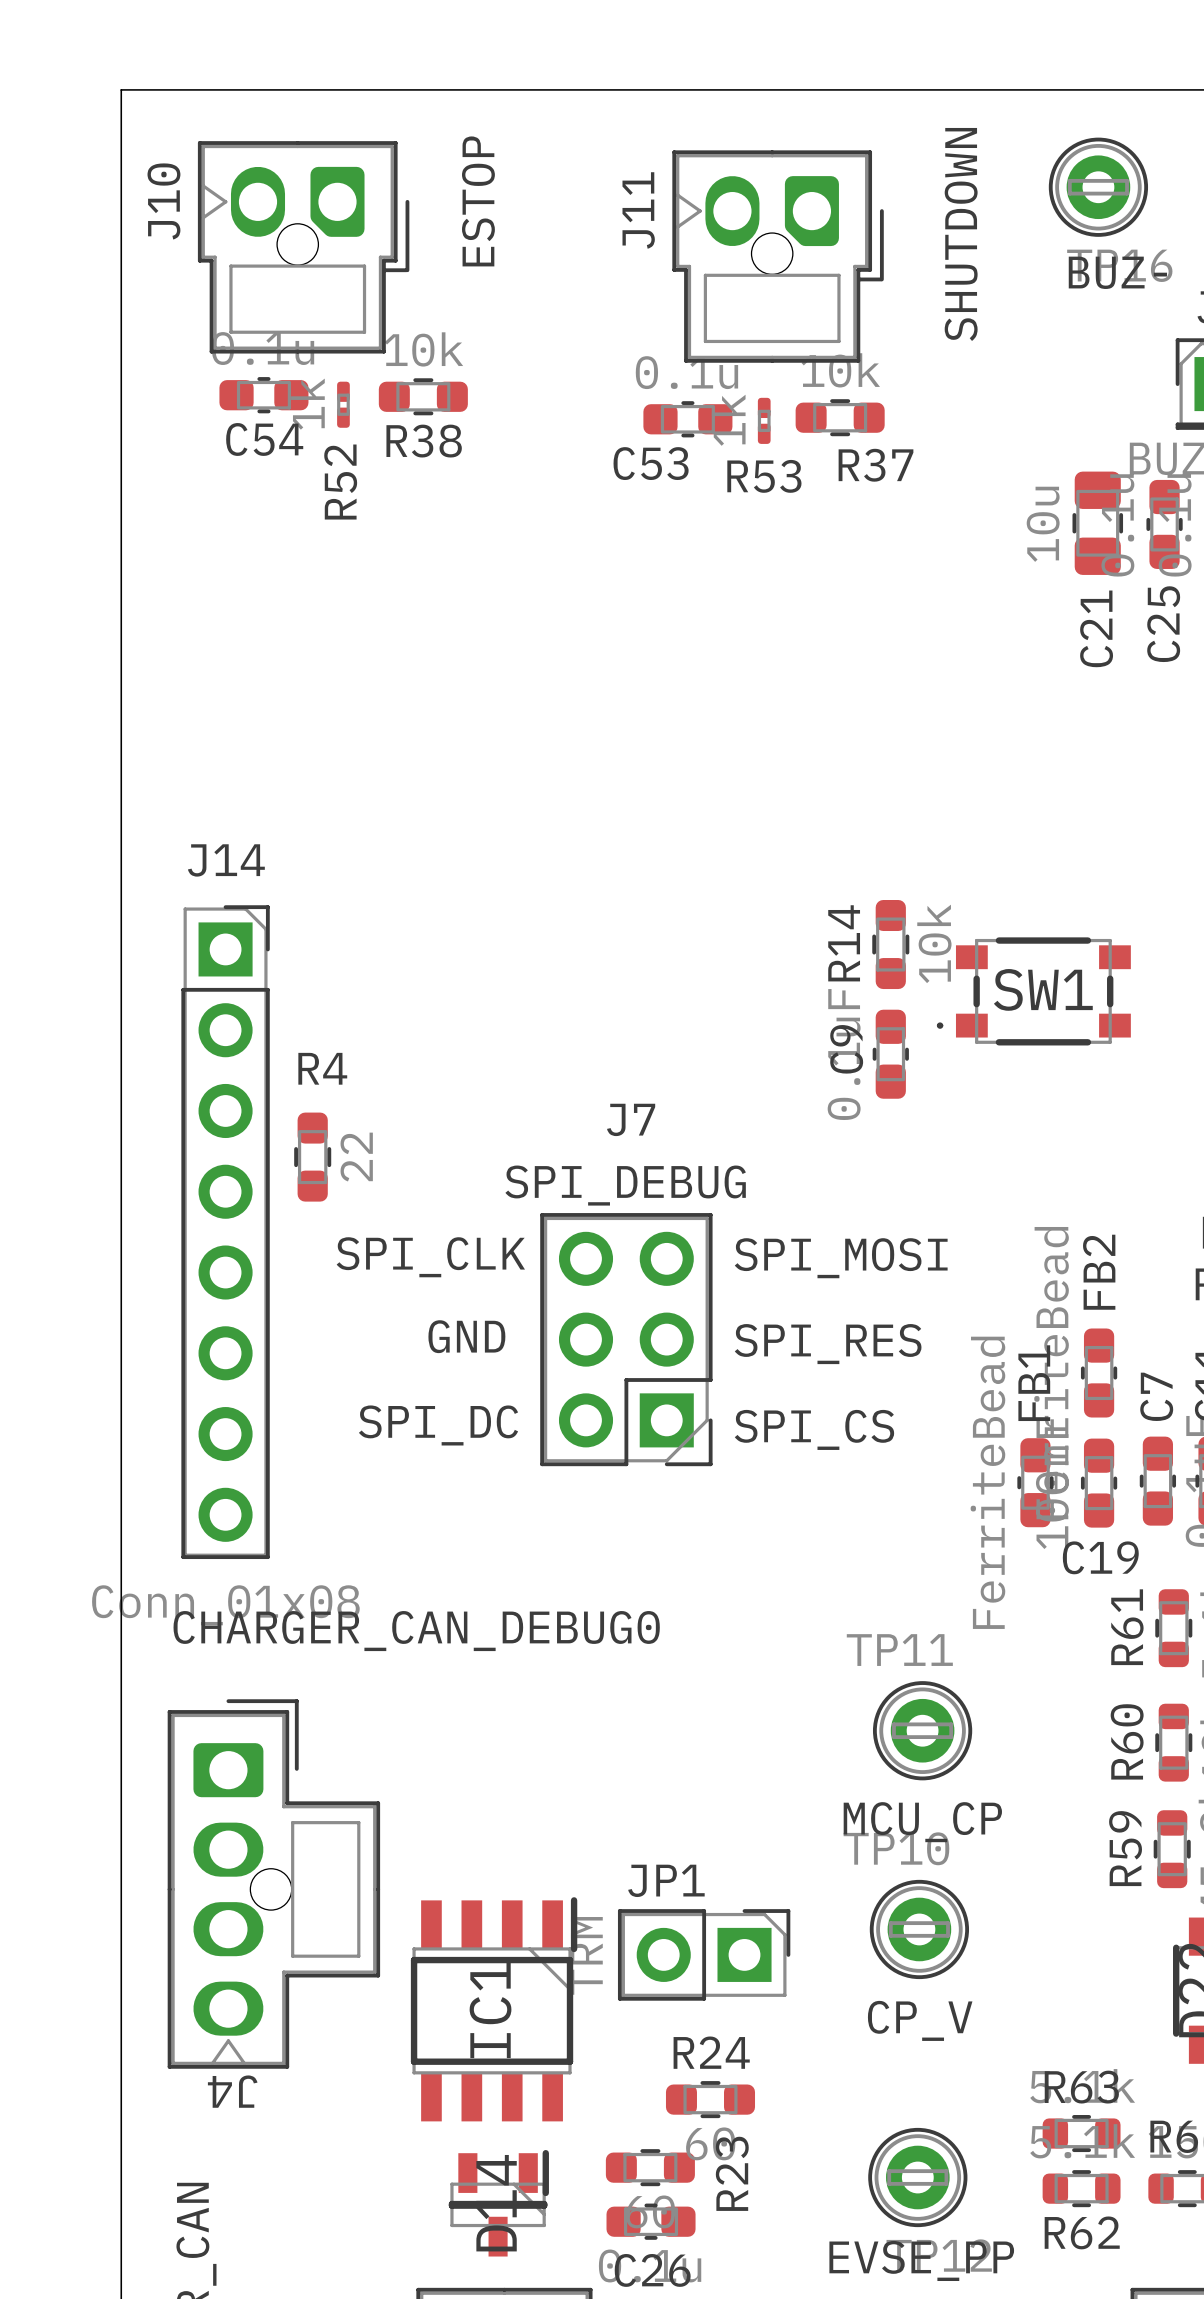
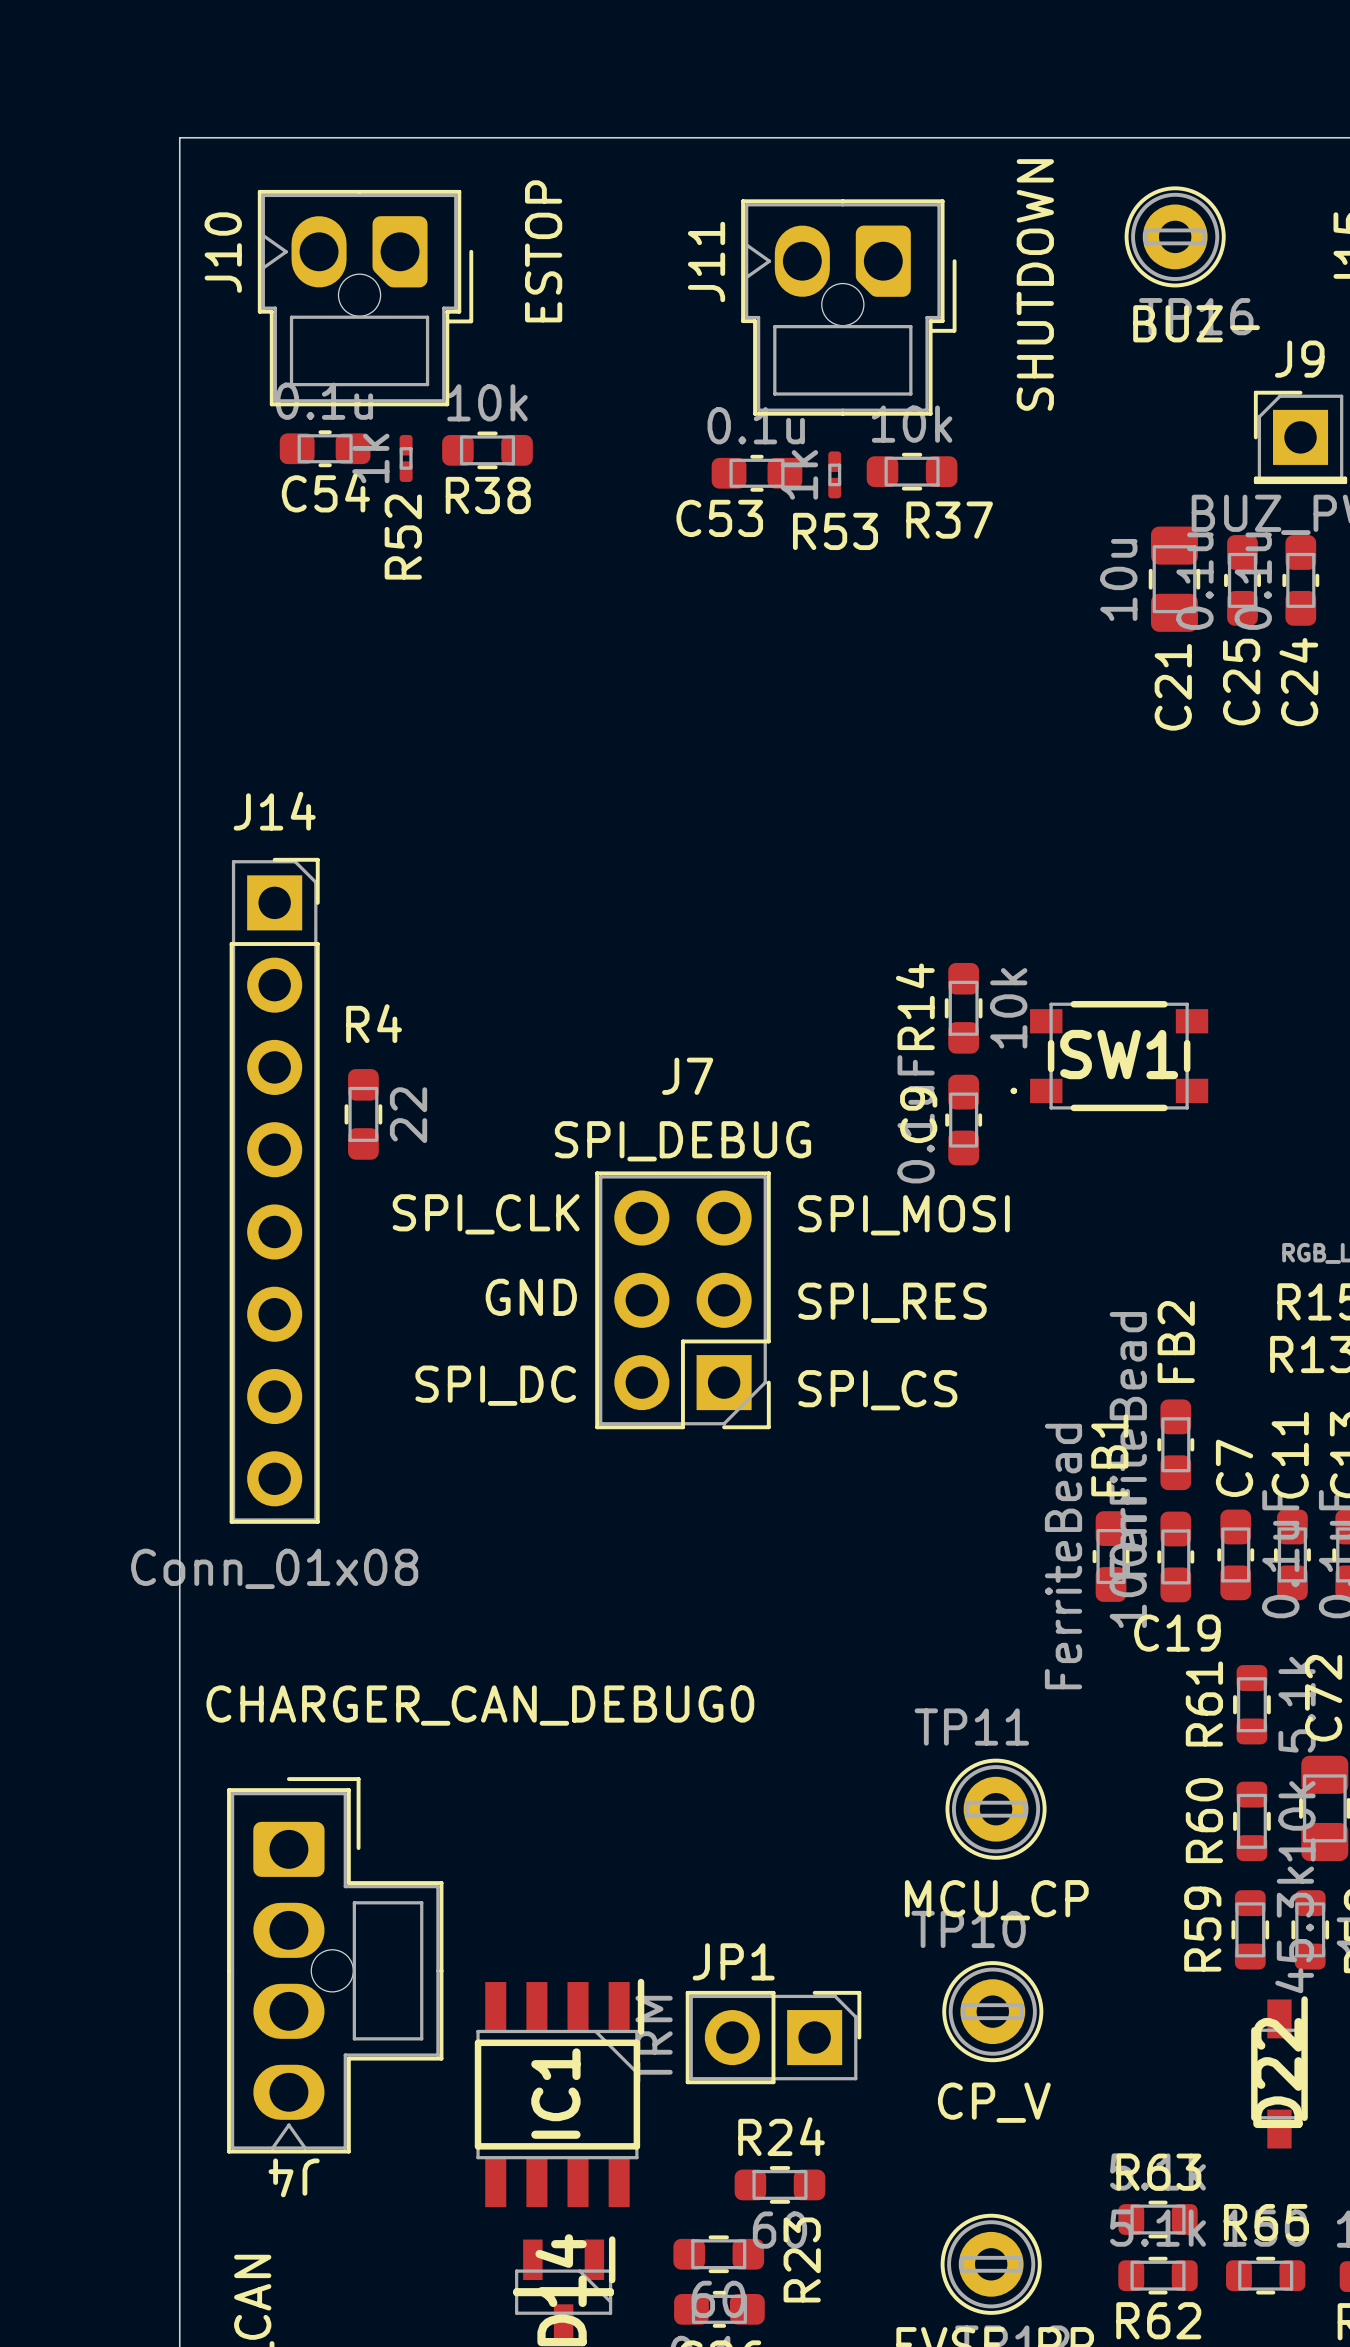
text: none -> SPI_MOSI (904, 1215)
R4 position: (312, 1157) -> (363, 1114)
J14 position: (225, 1232) -> (274, 1190)
text position: SPI_CLK (430, 1257) -> SPI_CLK (486, 1214)
text: SPI_MOSI (841, 1258) -> SPI_RES (892, 1302)
text position: GND (466, 1336) -> GND (531, 1297)
J7 position: (626, 1339) -> (682, 1300)
text: SPI_RES (828, 1344) -> SPI_CS (877, 1390)
text position: SPI_DC (438, 1425) -> SPI_DC (495, 1385)
text: SPI_CS (814, 1429) -> none

